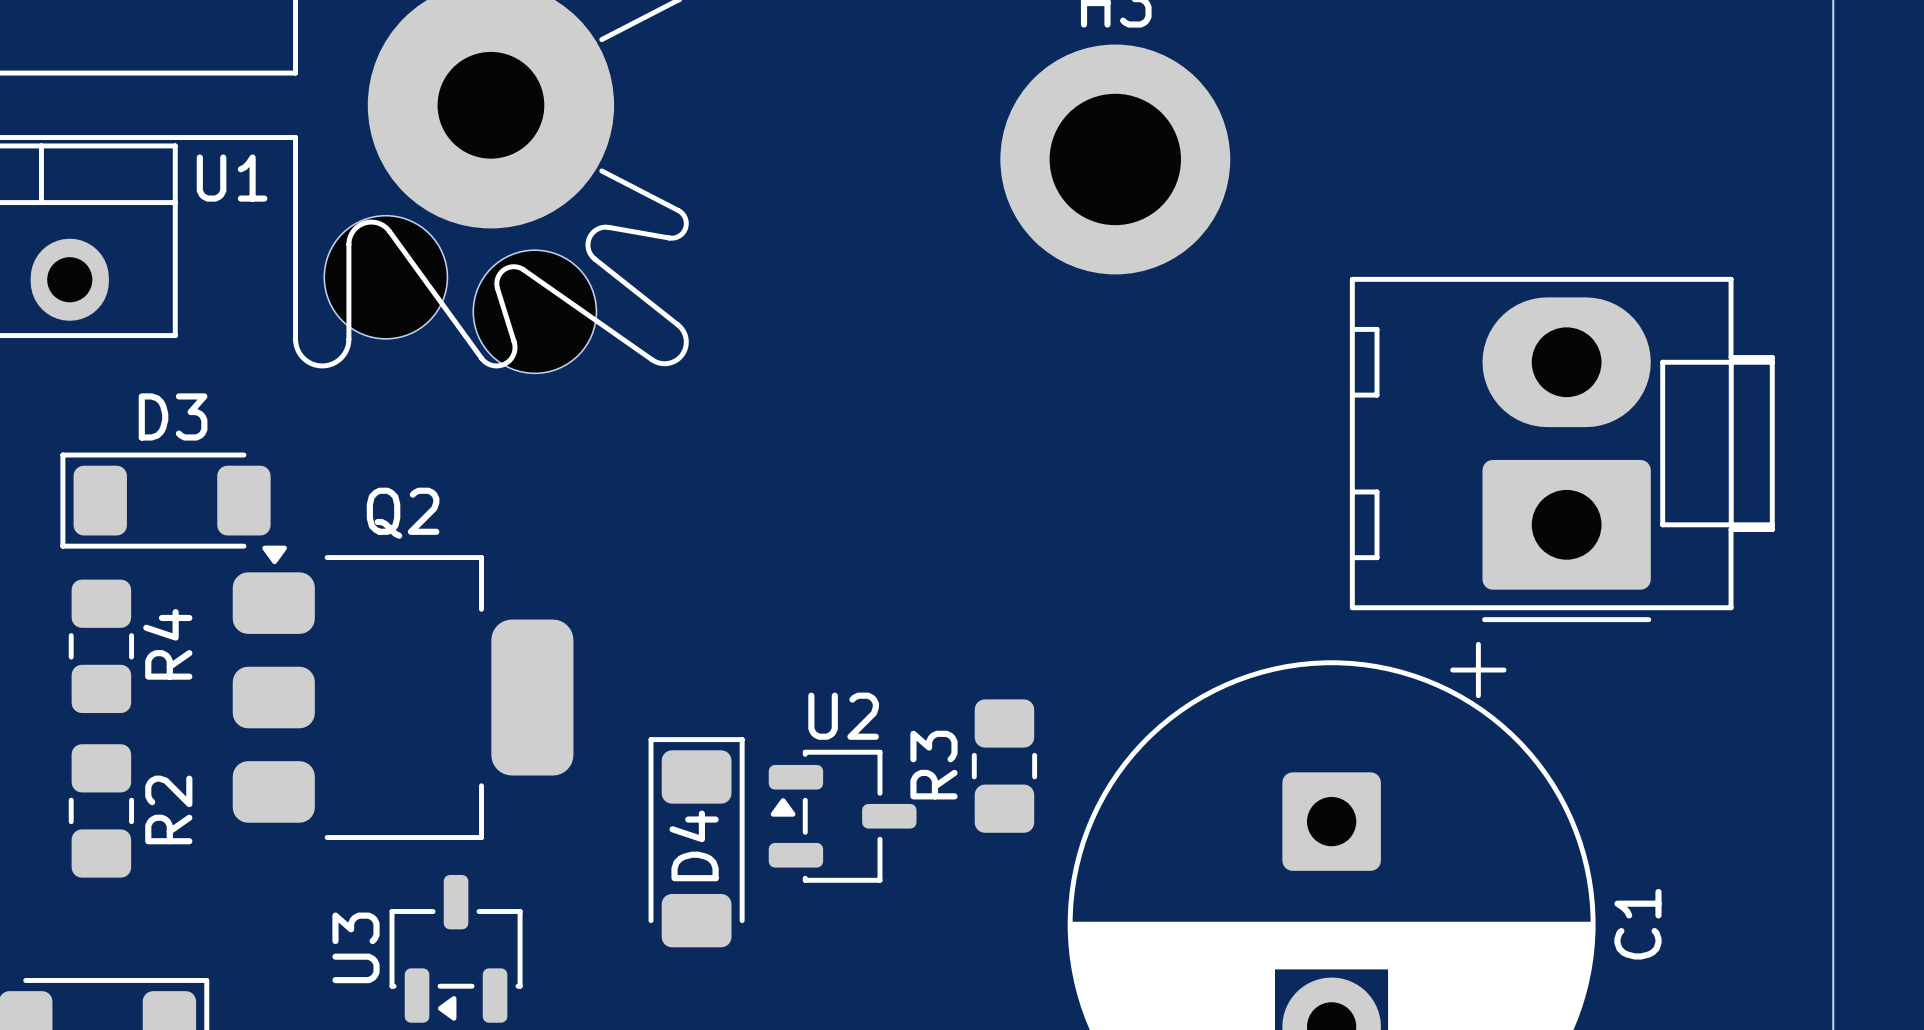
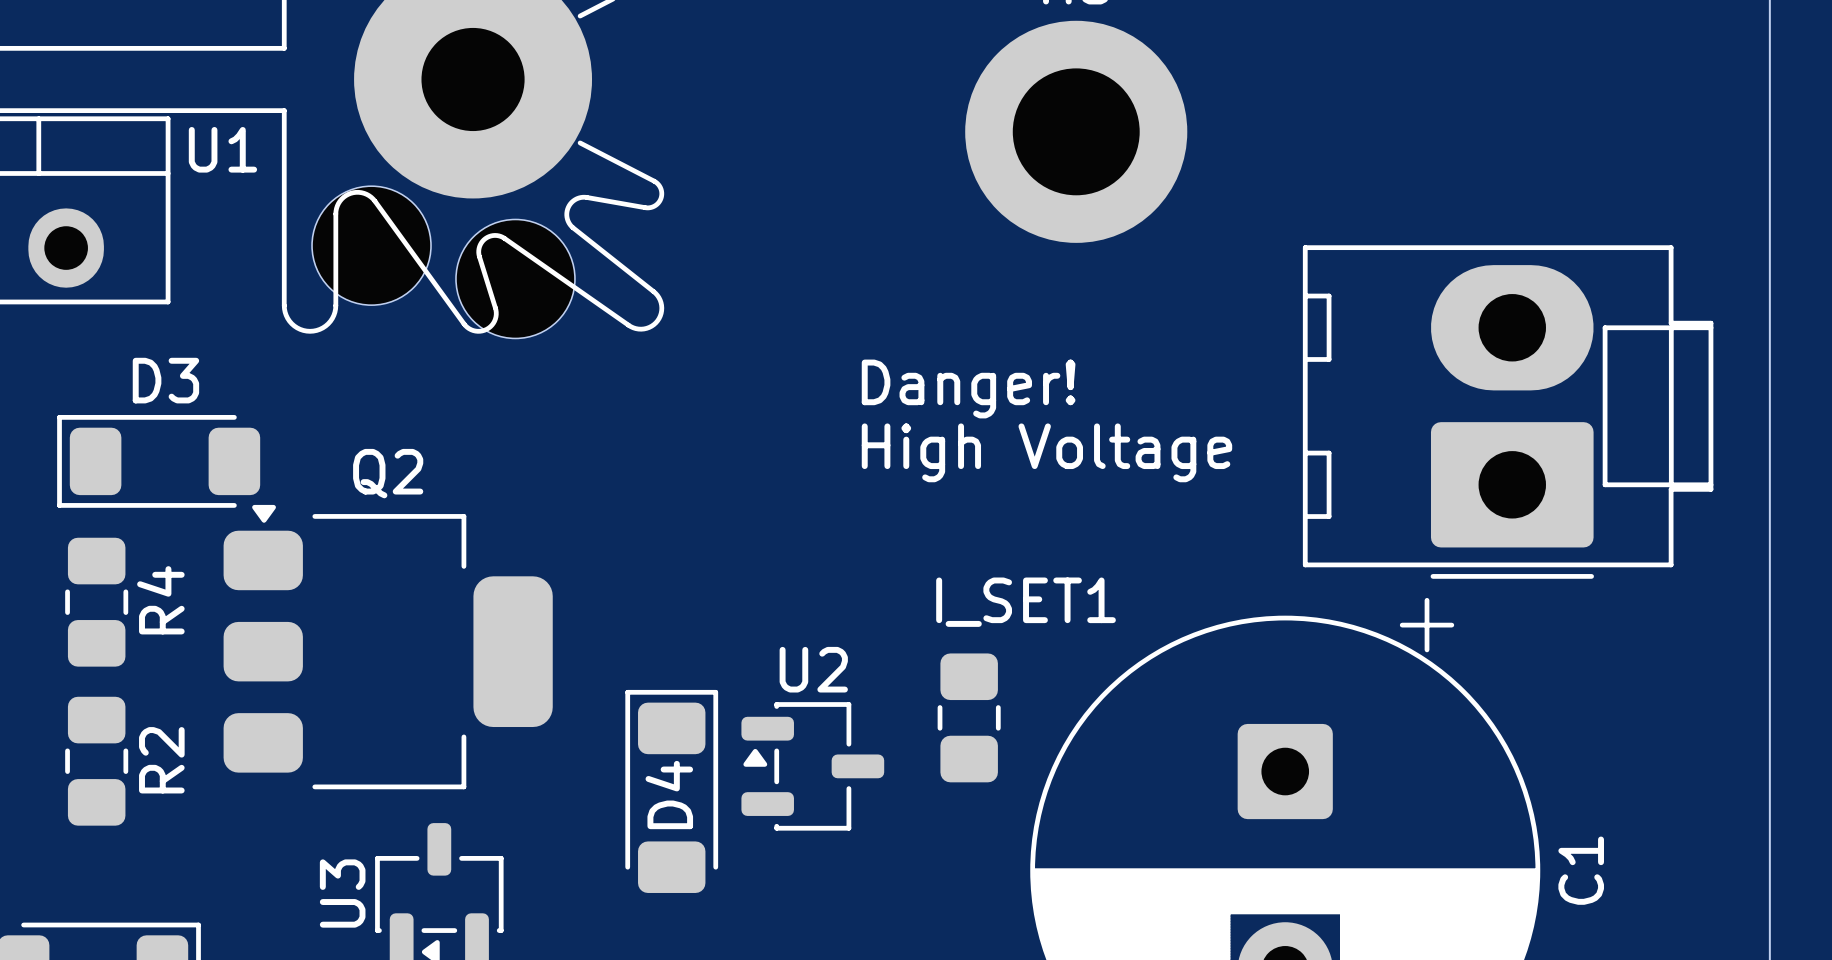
text: none -> Danger! (968, 388)
text: none -> High Voltage (1046, 452)
R3 name: R3 (933, 765) -> I_SET1 (1026, 602)

